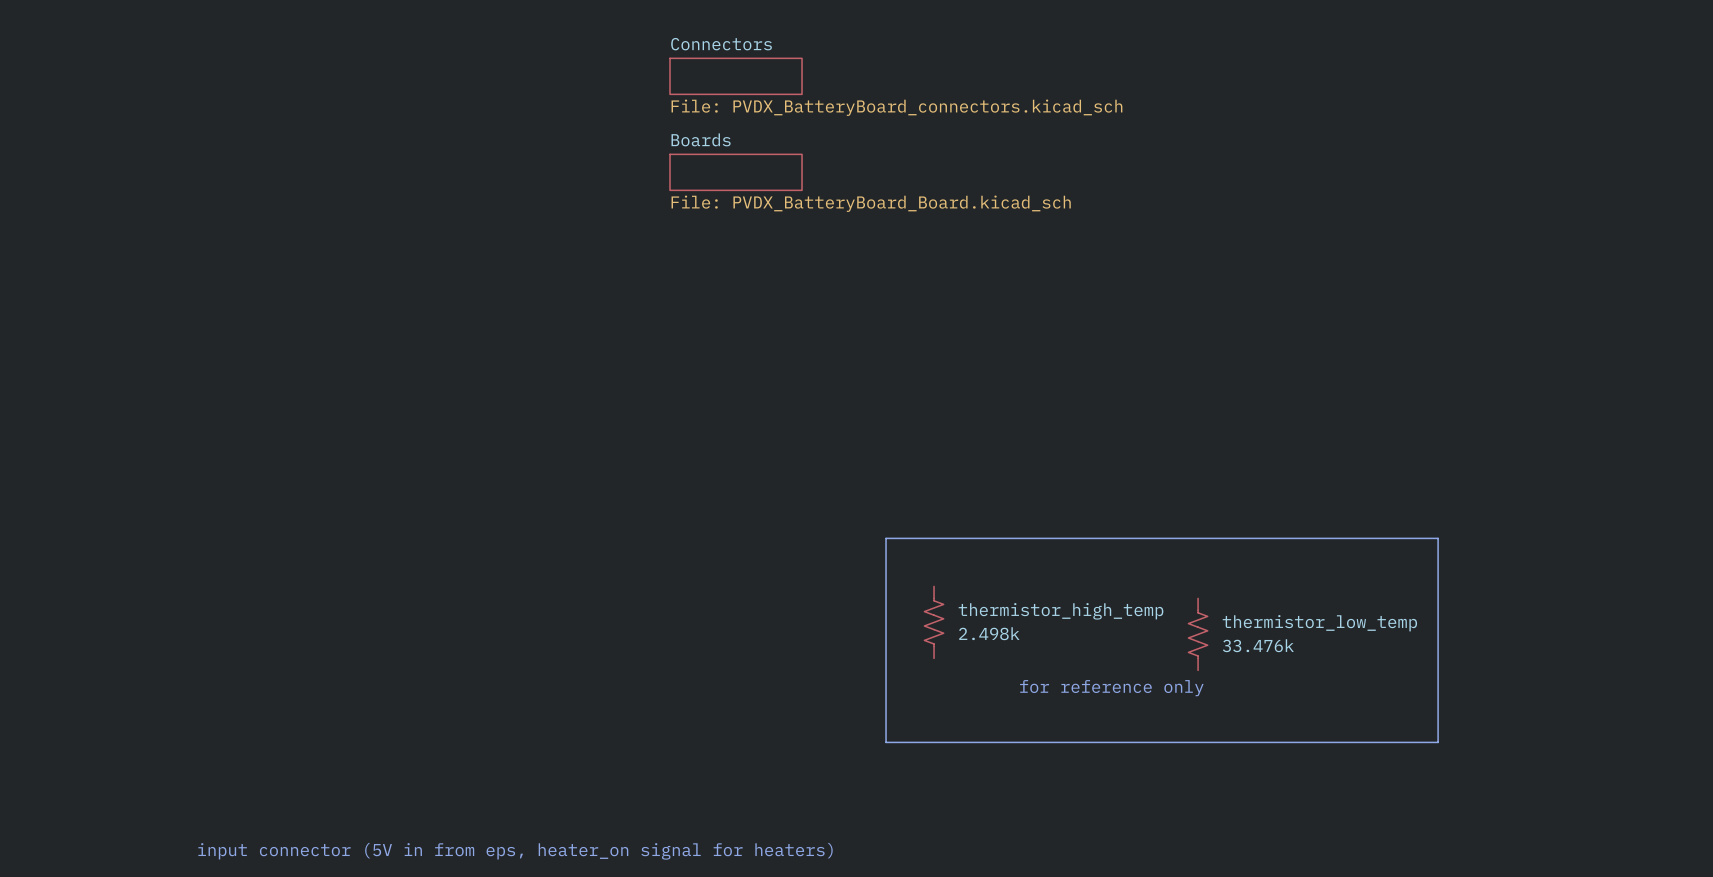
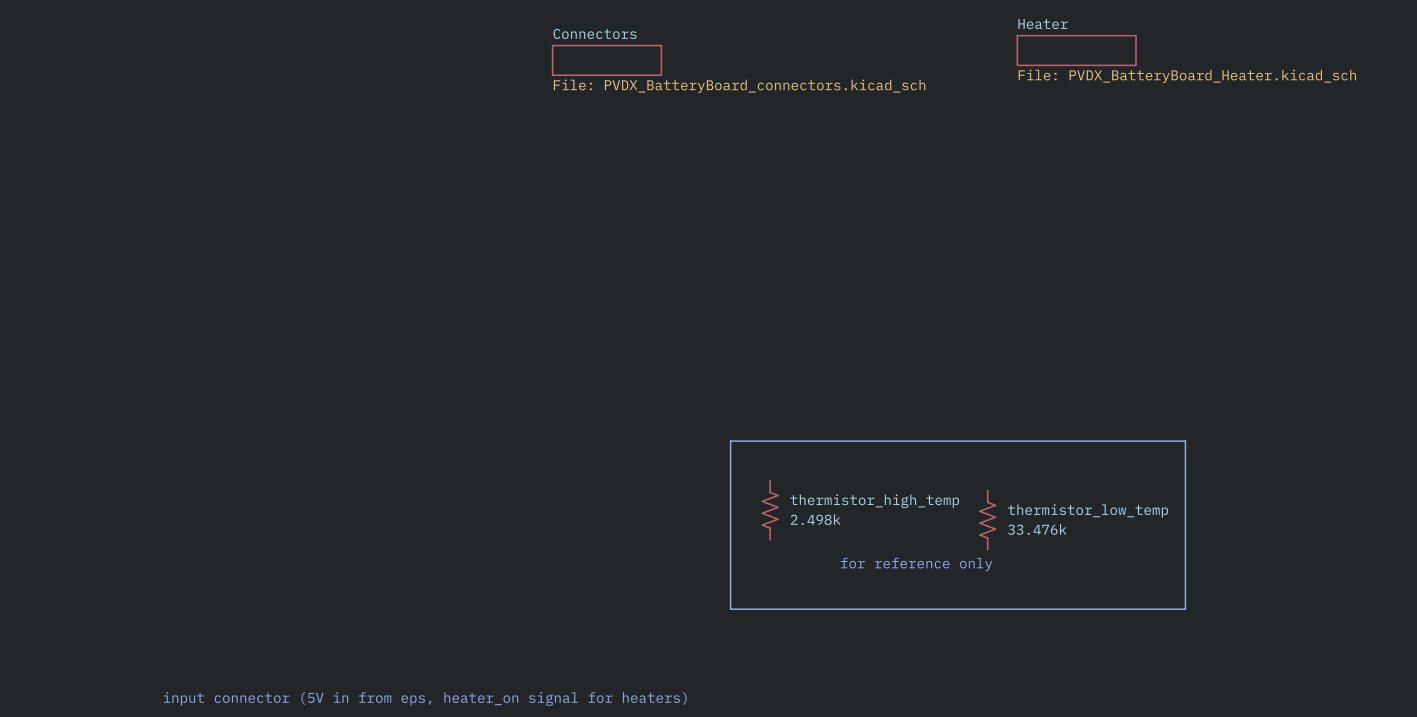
sheet Heater: none -> File: PVDX_BatteryBoard_Heater.kicad_sch (1076, 50)
sheet Boards: File: PVDX_BatteryBoard_Board.kicad_sch (736, 172) -> none

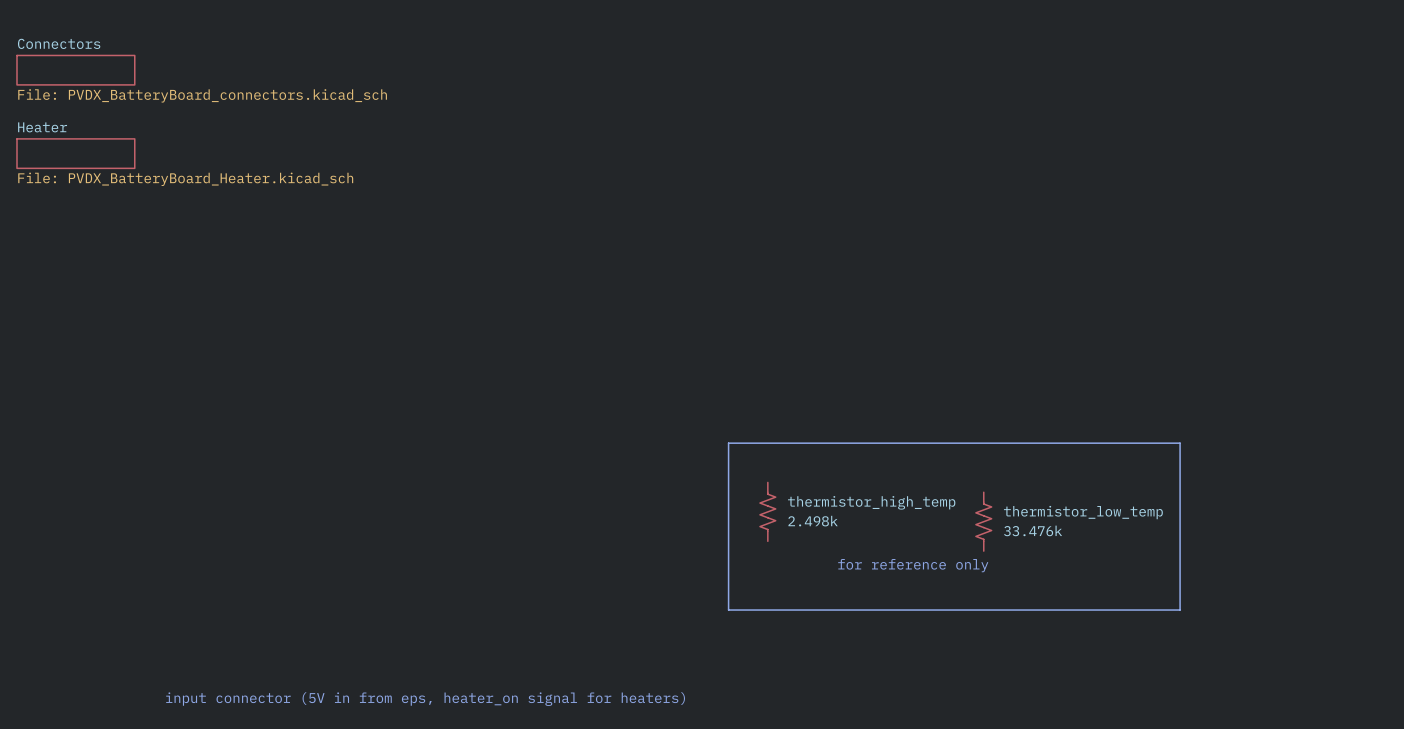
sheet Heater: File: PVDX_BatteryBoard_Heater.kicad_sch (1076, 50) -> none
sheet Connectors: File: PVDX_BatteryBoard_connectors.kicad_sch (606, 60) -> none
sheet Connectors: none -> File: PVDX_BatteryBoard_connectors.kicad_sch (75, 70)
sheet Heater: none -> File: PVDX_BatteryBoard_Heater.kicad_sch (75, 153)

